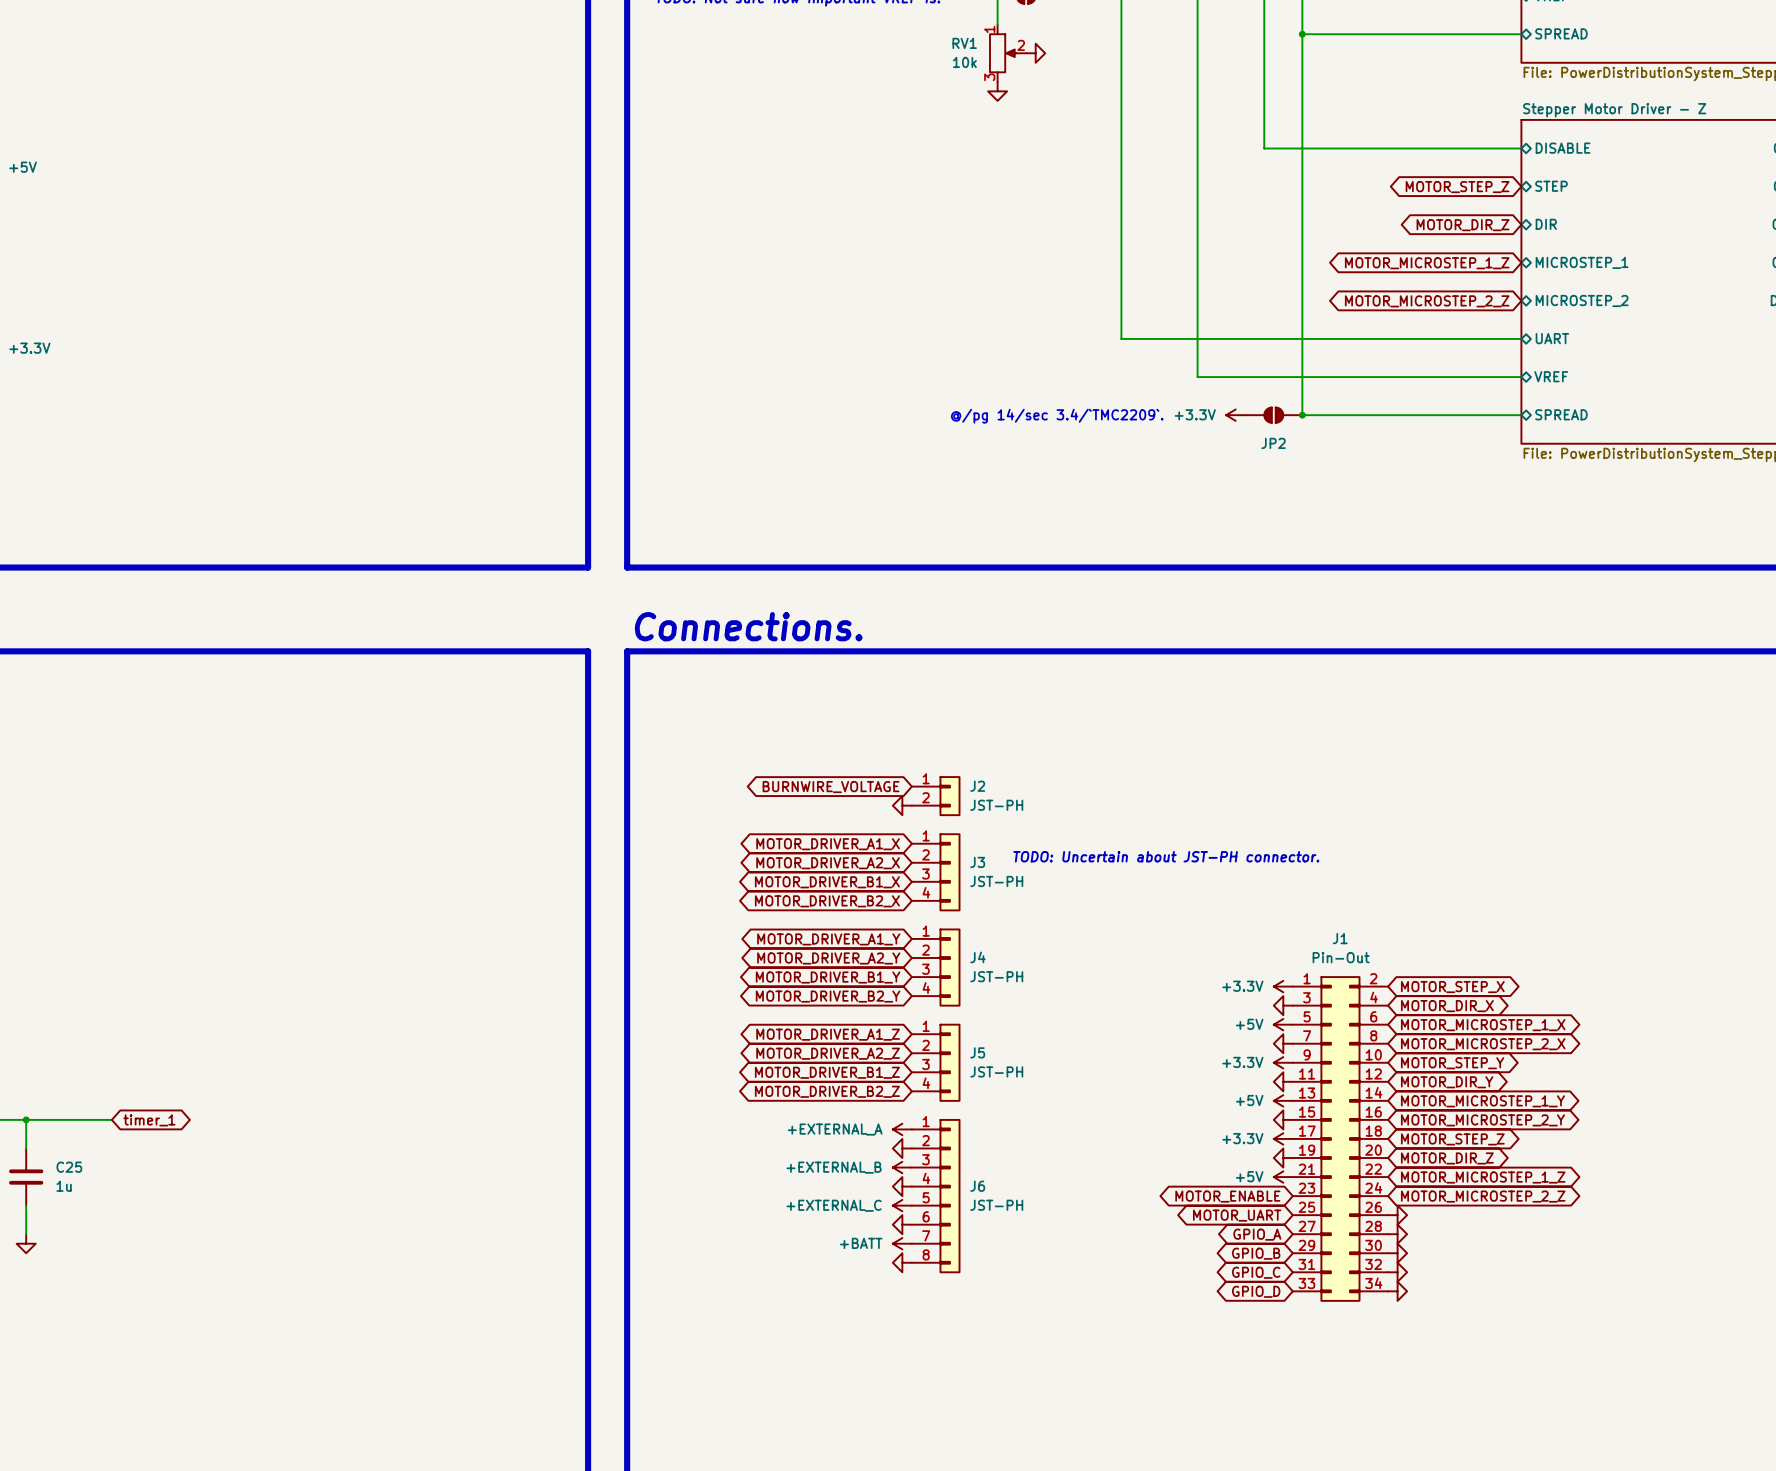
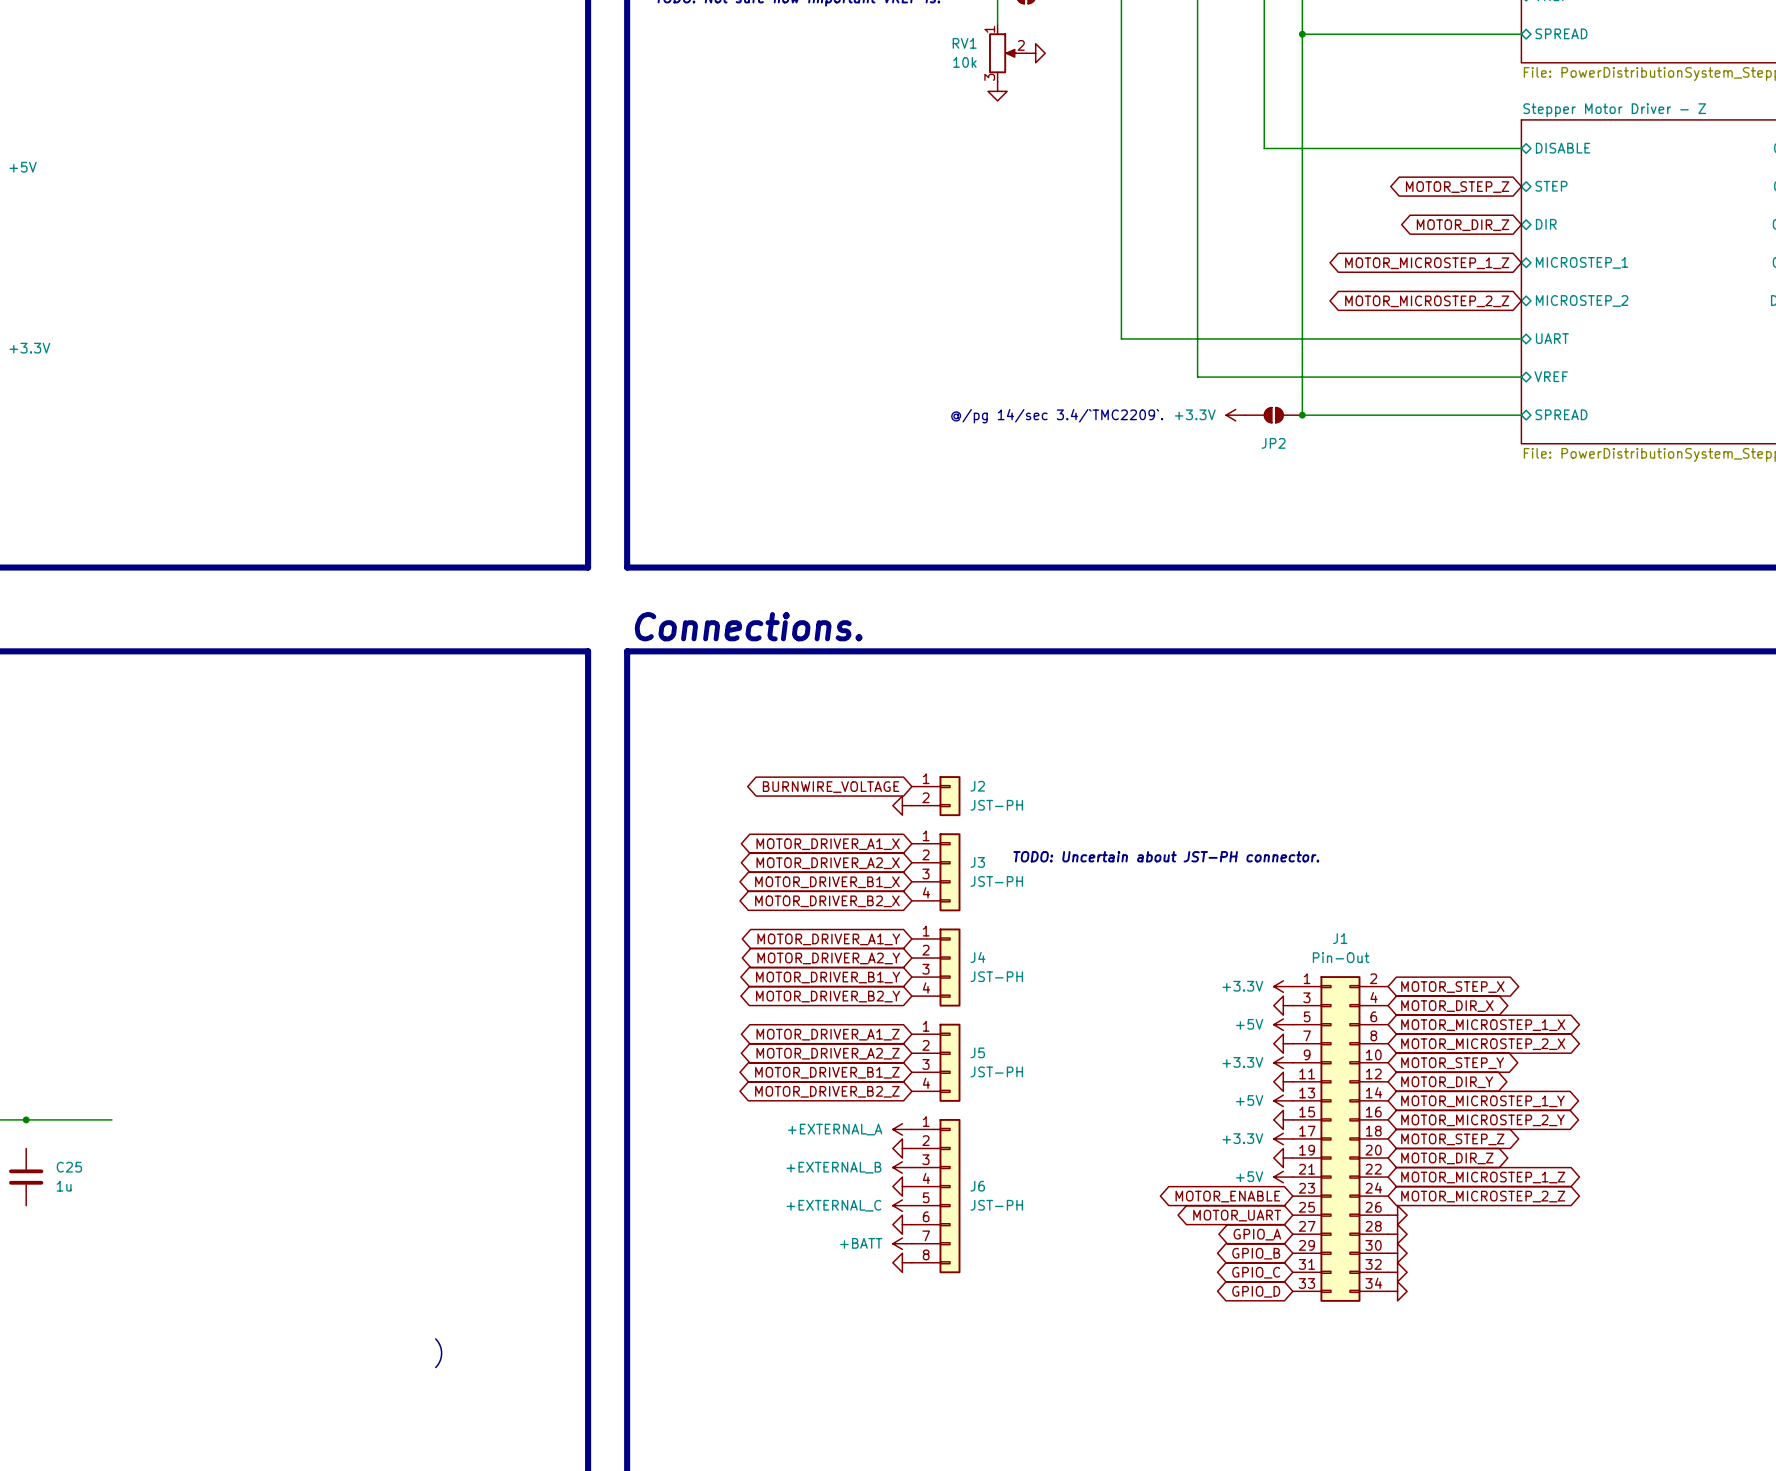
wire: (26, 1119) (26, 1148) -> none
global label: timer_1 (149, 1120) -> none
wire: (26, 1205) (26, 1234) -> none
power symbol: (26, 1243) -> none
line: none -> (435, 1338) (439, 1344) (441, 1353) (439, 1362) (435, 1367)

